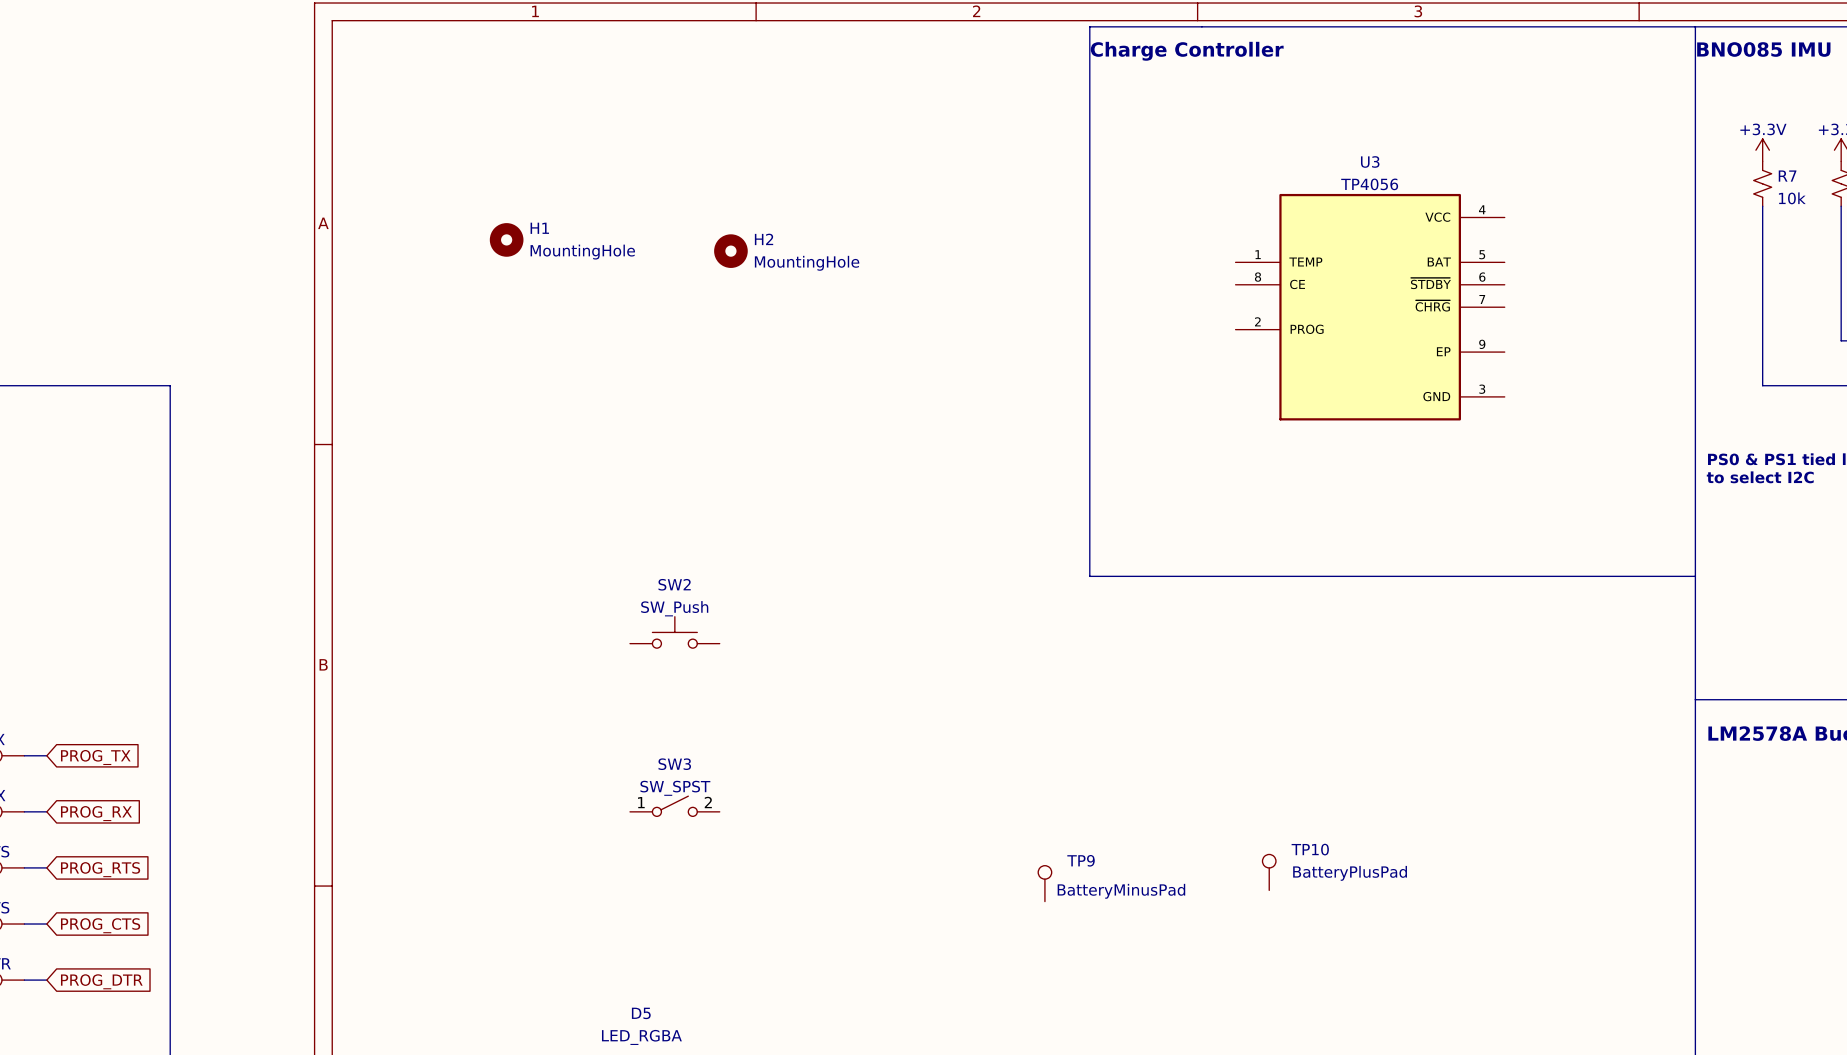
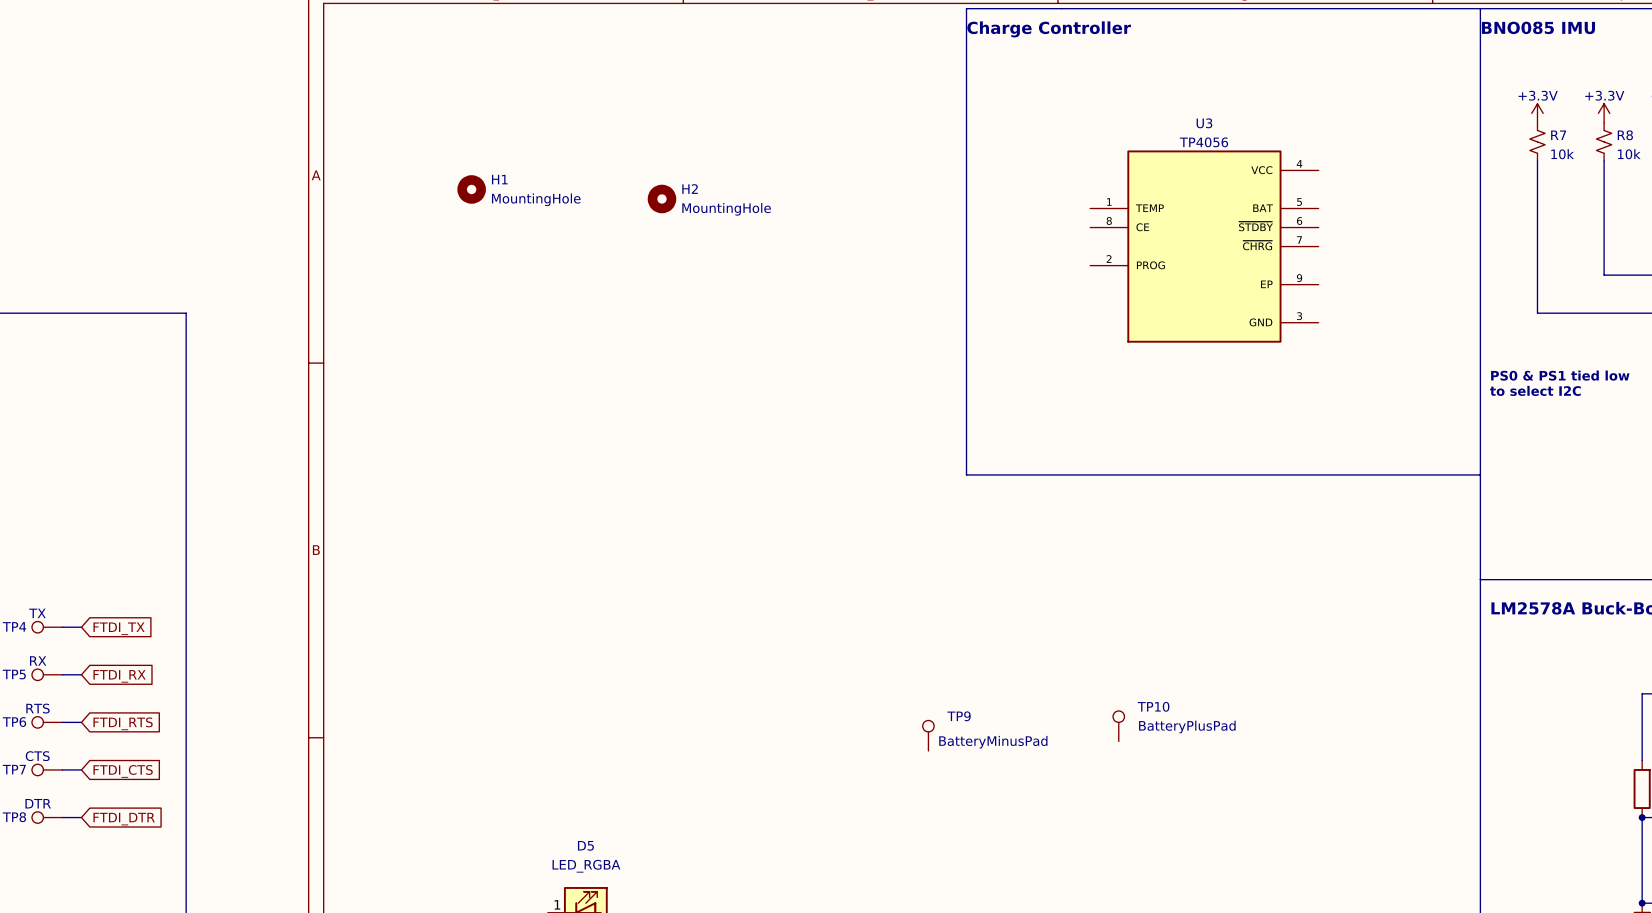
SW2: SW_Push (674, 632) -> none
global label: PROG_TX (95, 757) -> FTDI_TX (119, 628)
SW3: SW_SPST (674, 806) -> none
global label: PROG_RX (96, 813) -> FTDI_RX (119, 676)
global label: PROG_RTS (100, 869) -> FTDI_RTS (123, 723)
global label: PROG_CTS (100, 925) -> FTDI_CTS (123, 771)
global label: PROG_DTR (101, 981) -> FTDI_DTR (124, 819)

